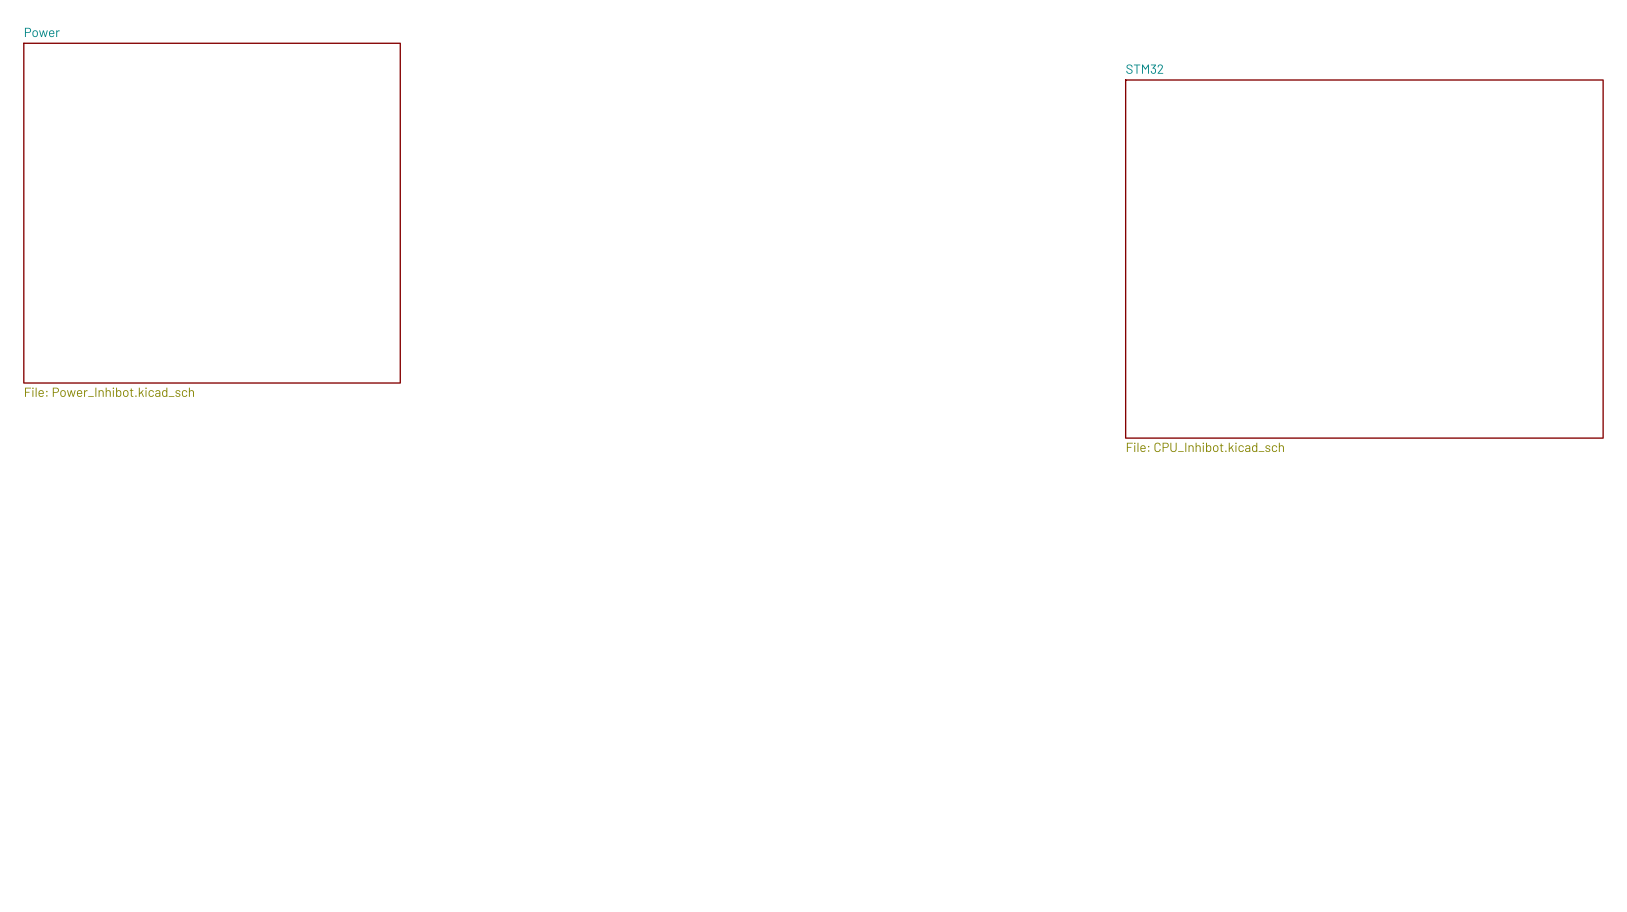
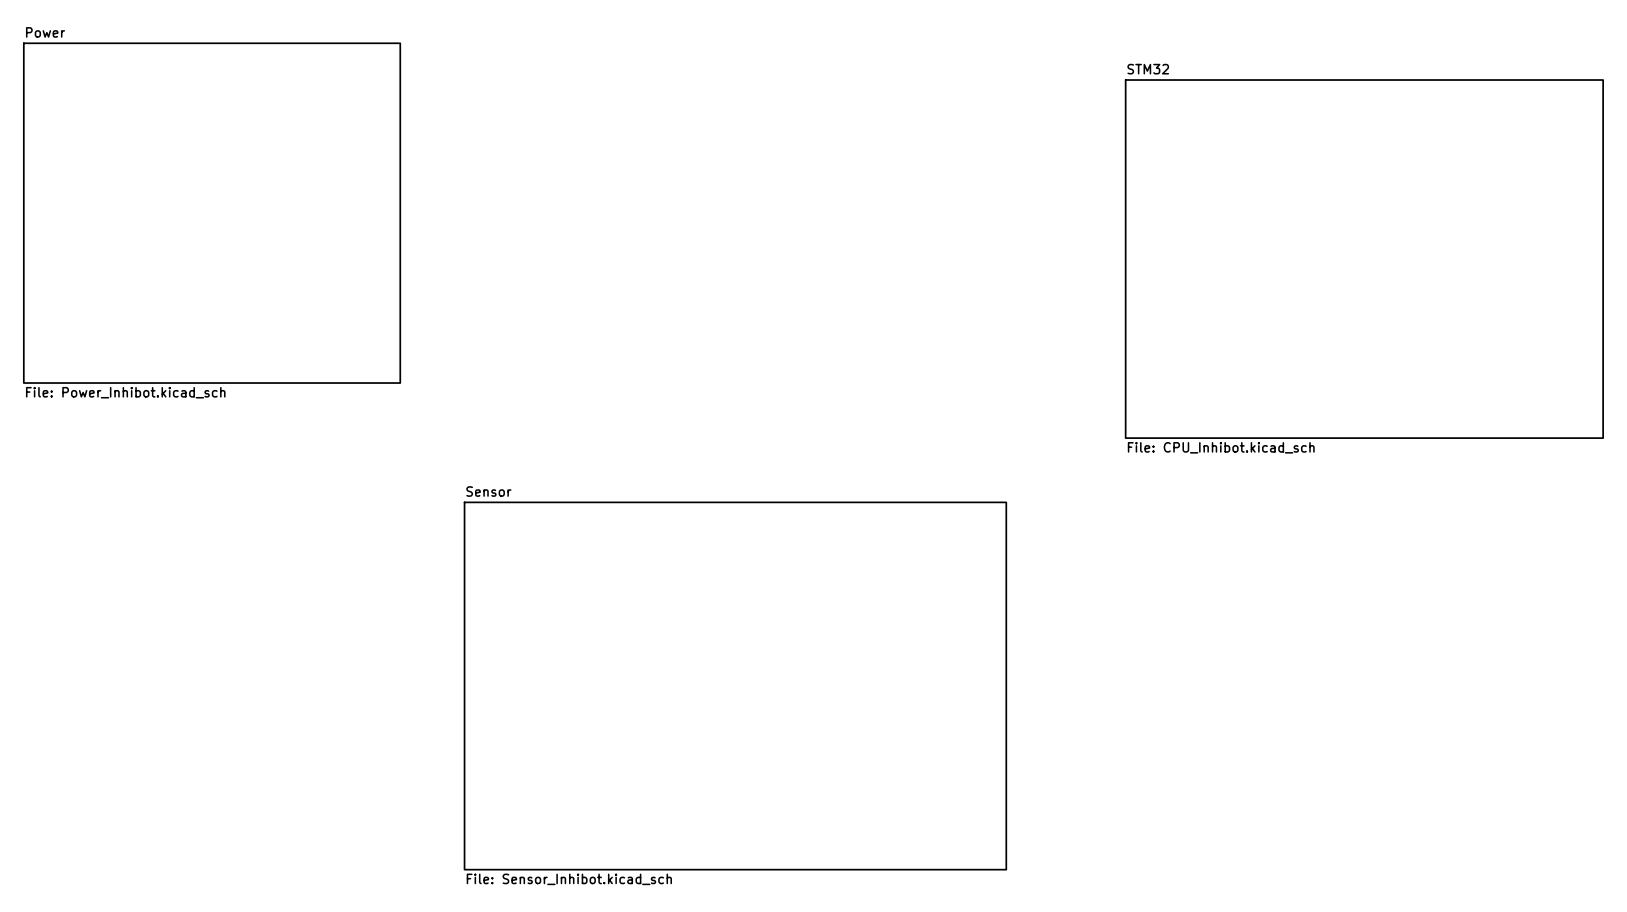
sheet Sensor: none -> File: Sensor_Inhibot.kicad_sch (735, 686)

